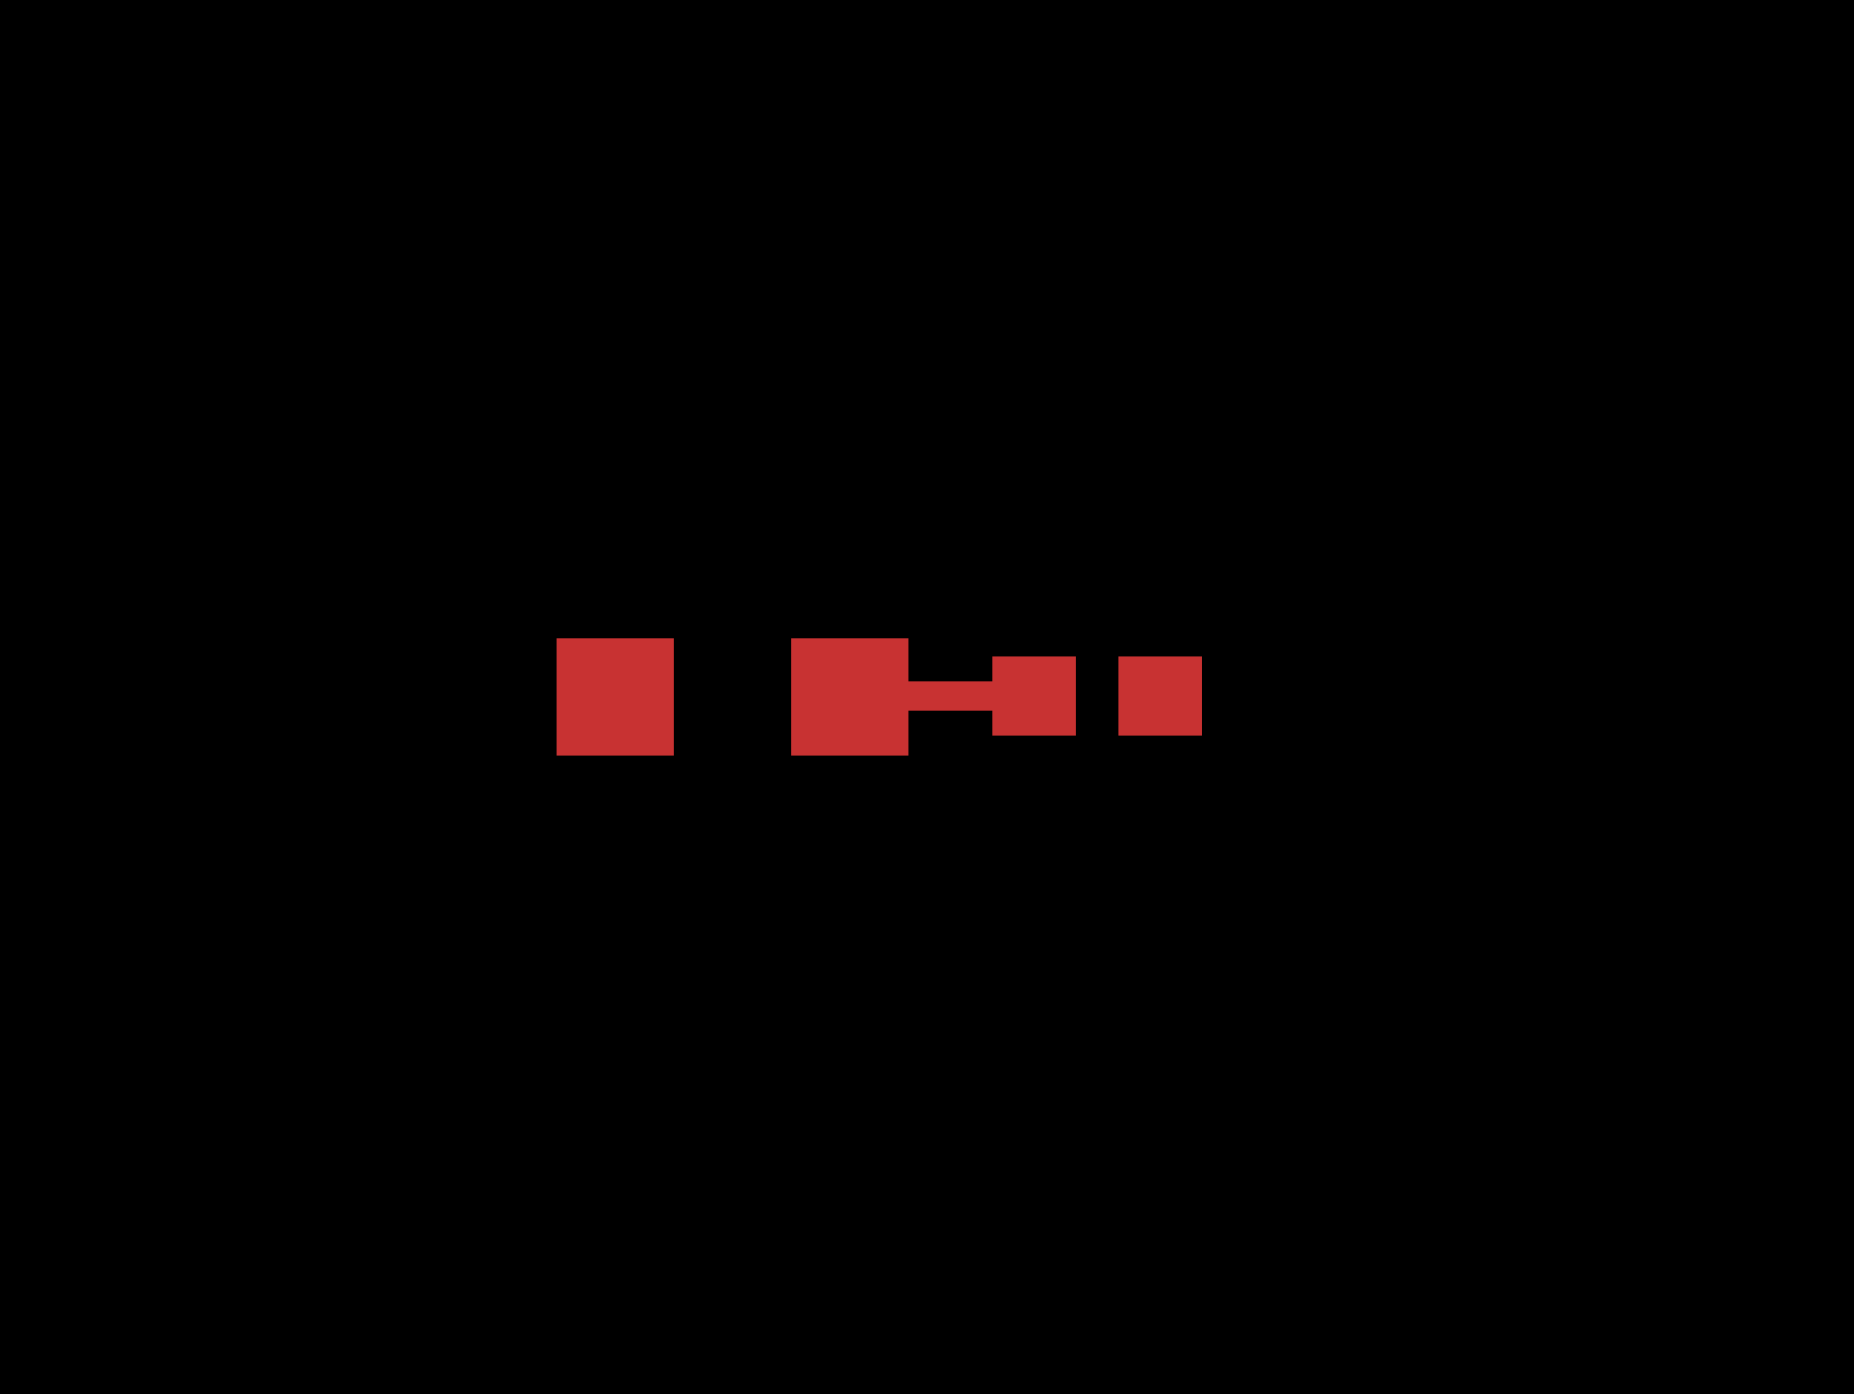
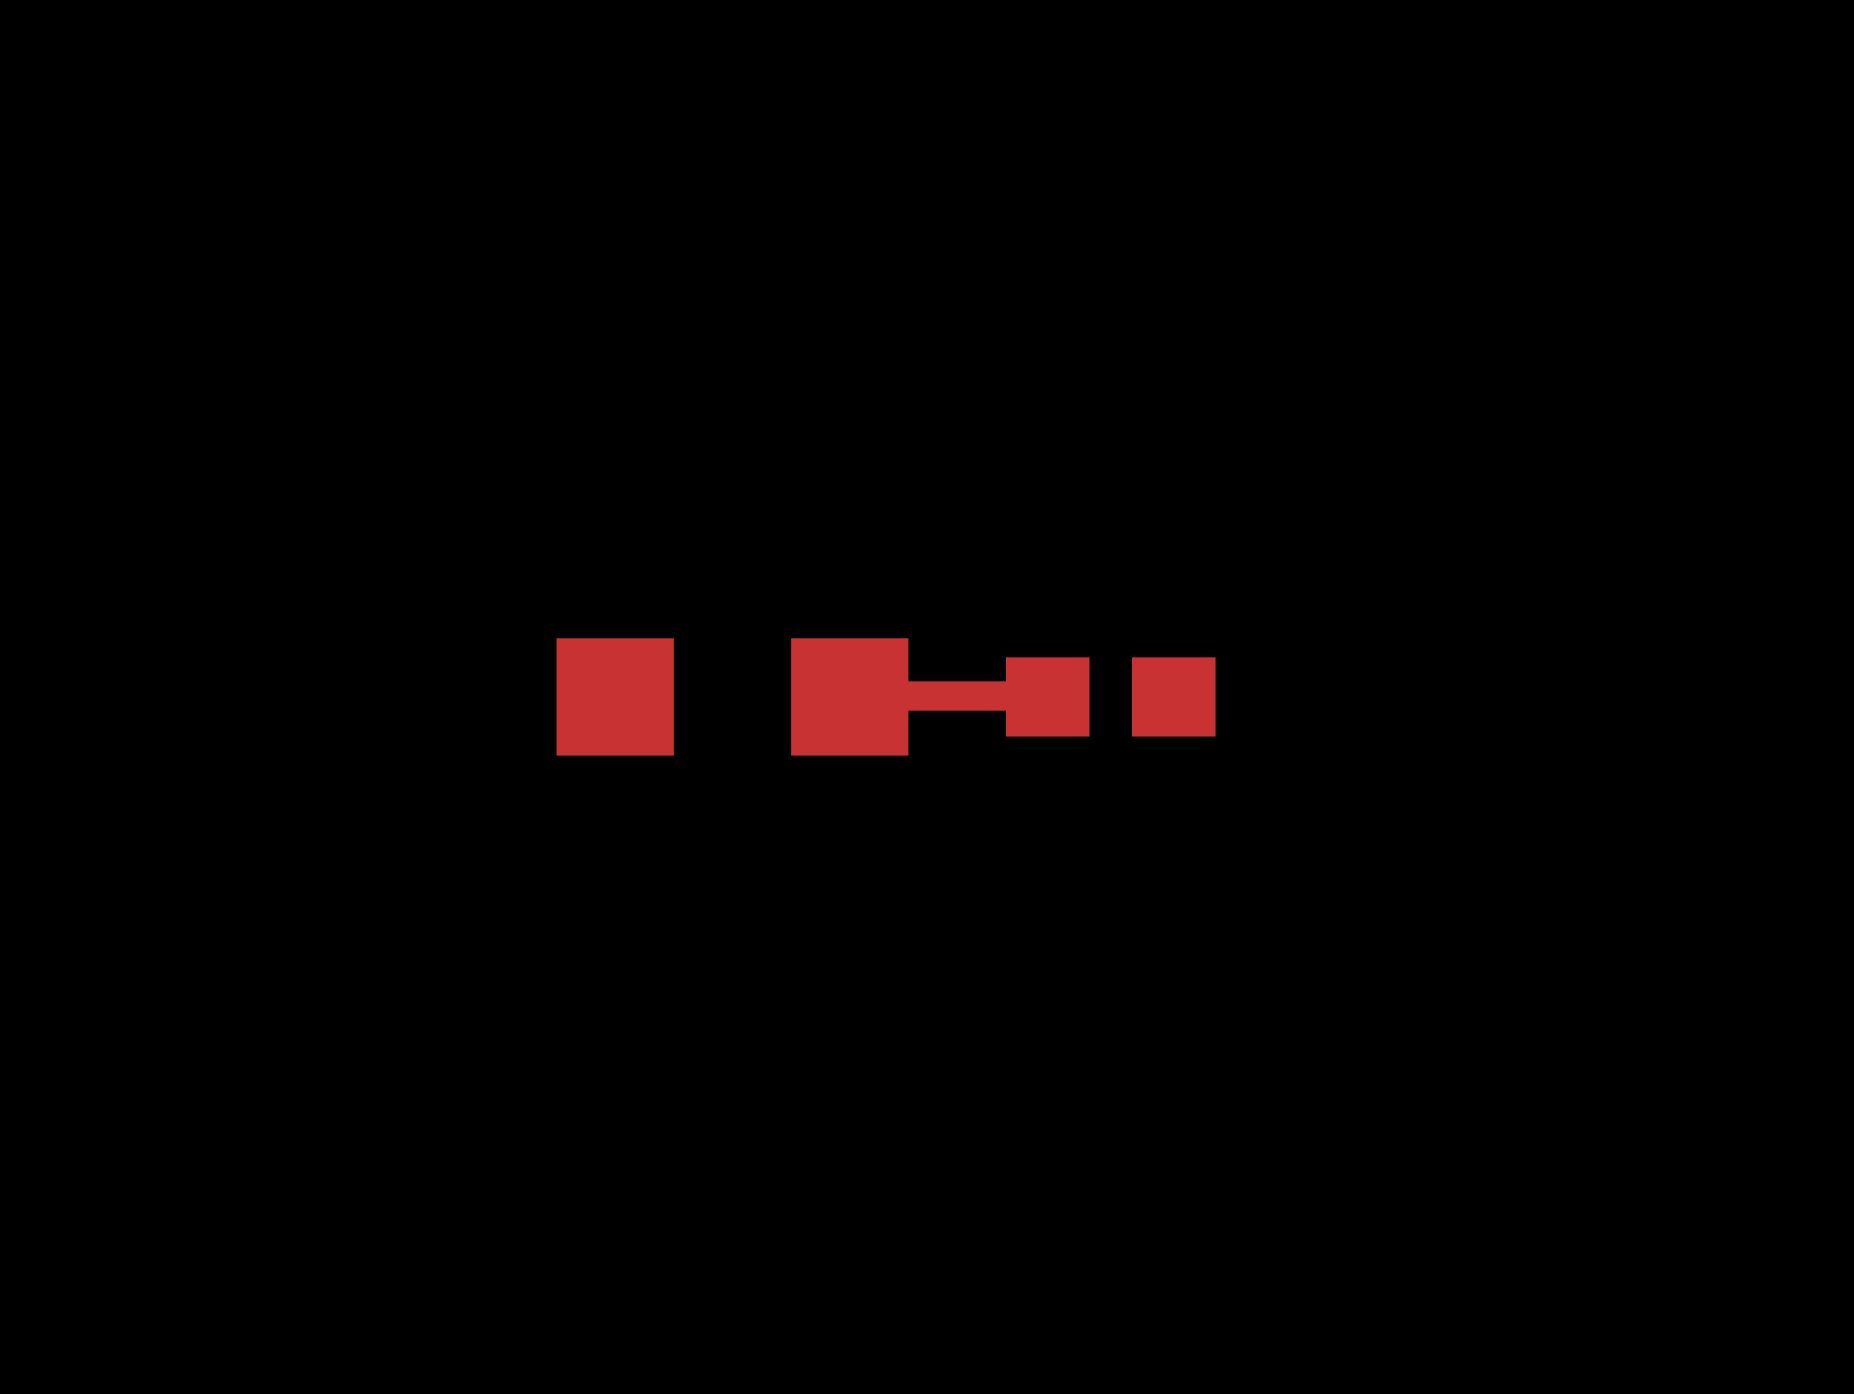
part position: (1097, 696) -> (1110, 696)

